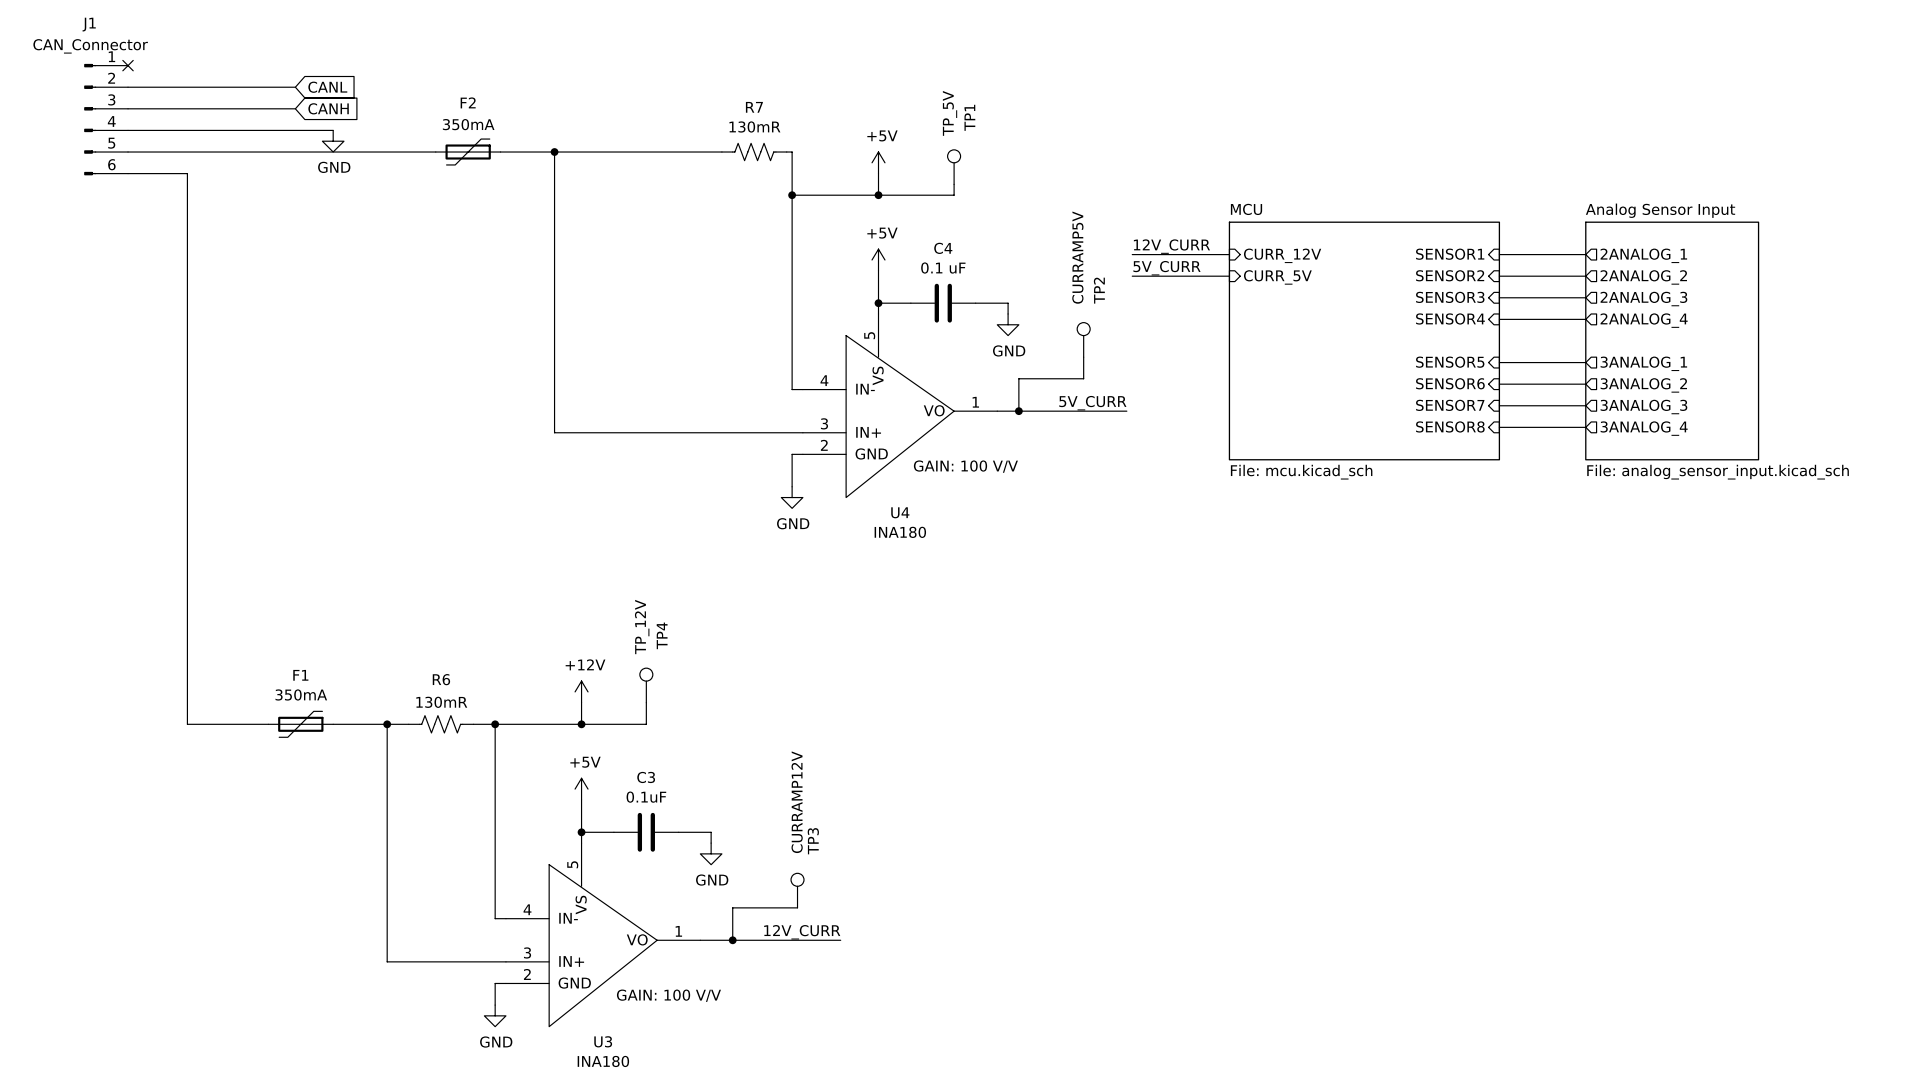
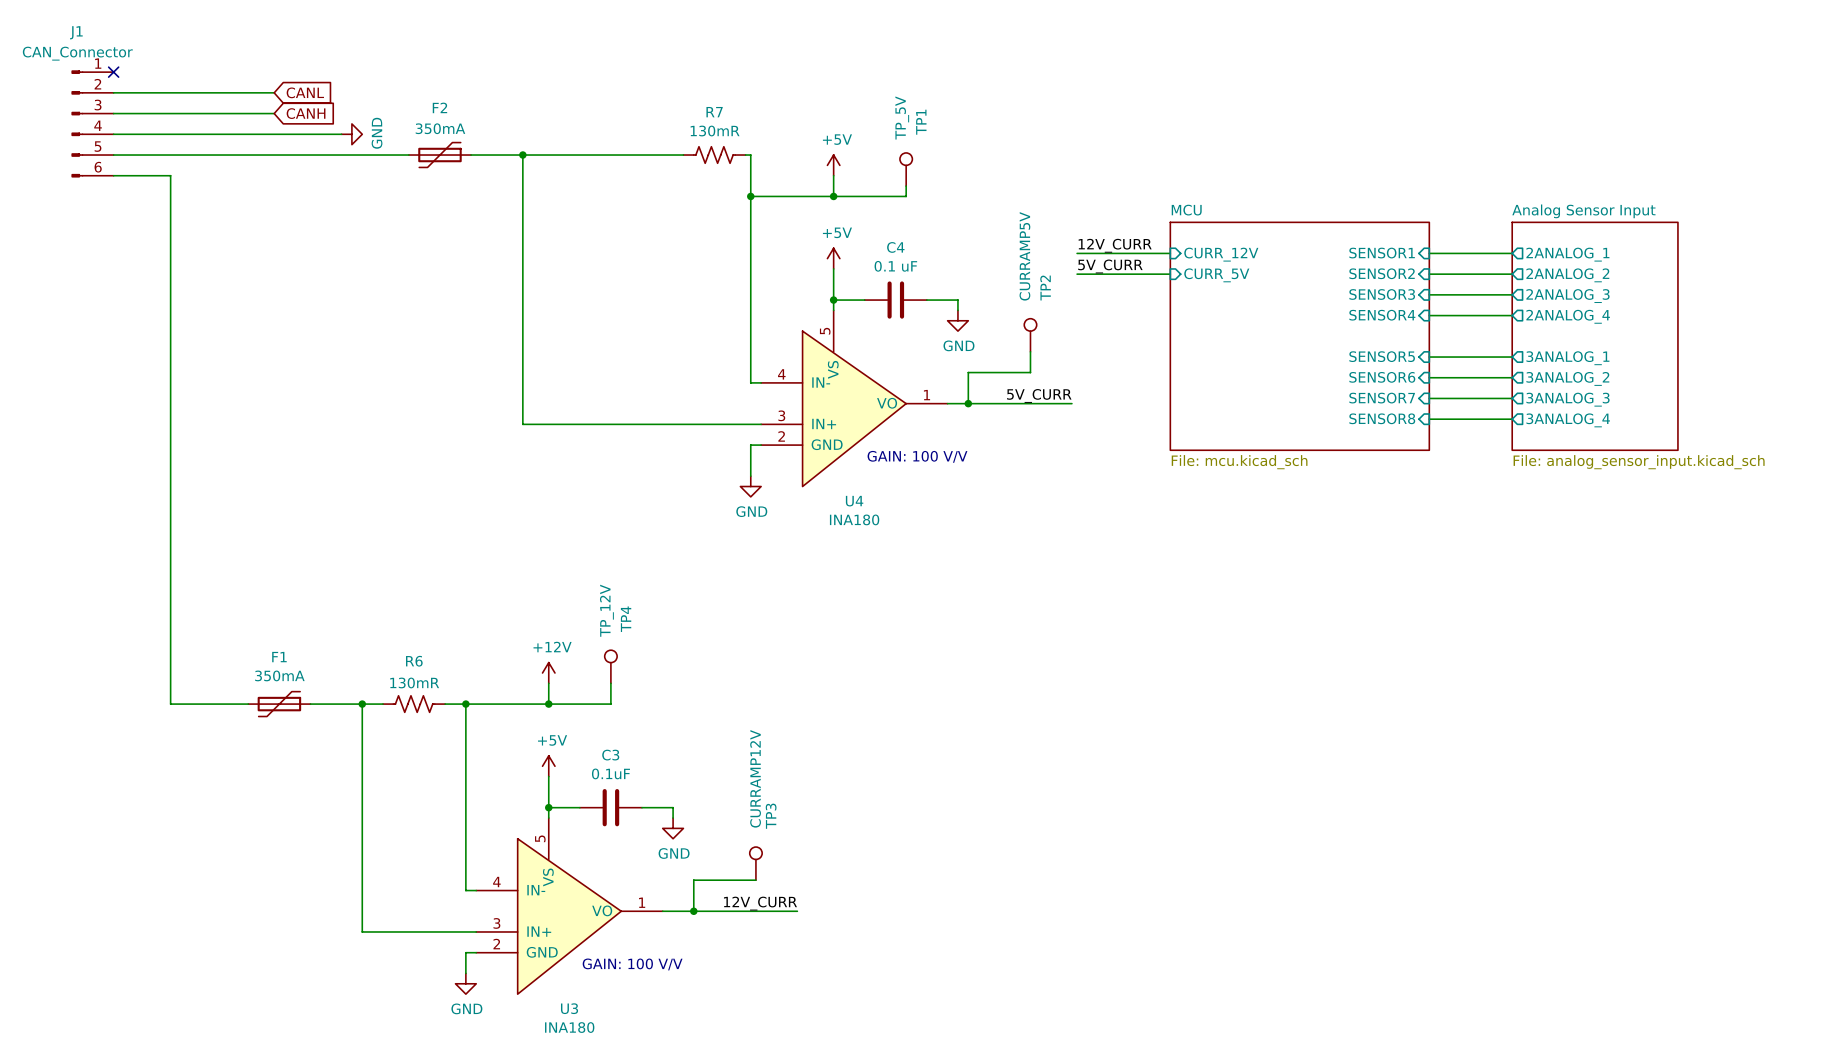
wire: none -> (310, 134) (341, 134)
power symbol rotation: 0° (333, 141) -> 90° counterclockwise (351, 134)
power symbol position: GND (333, 141) -> GND (351, 134)

